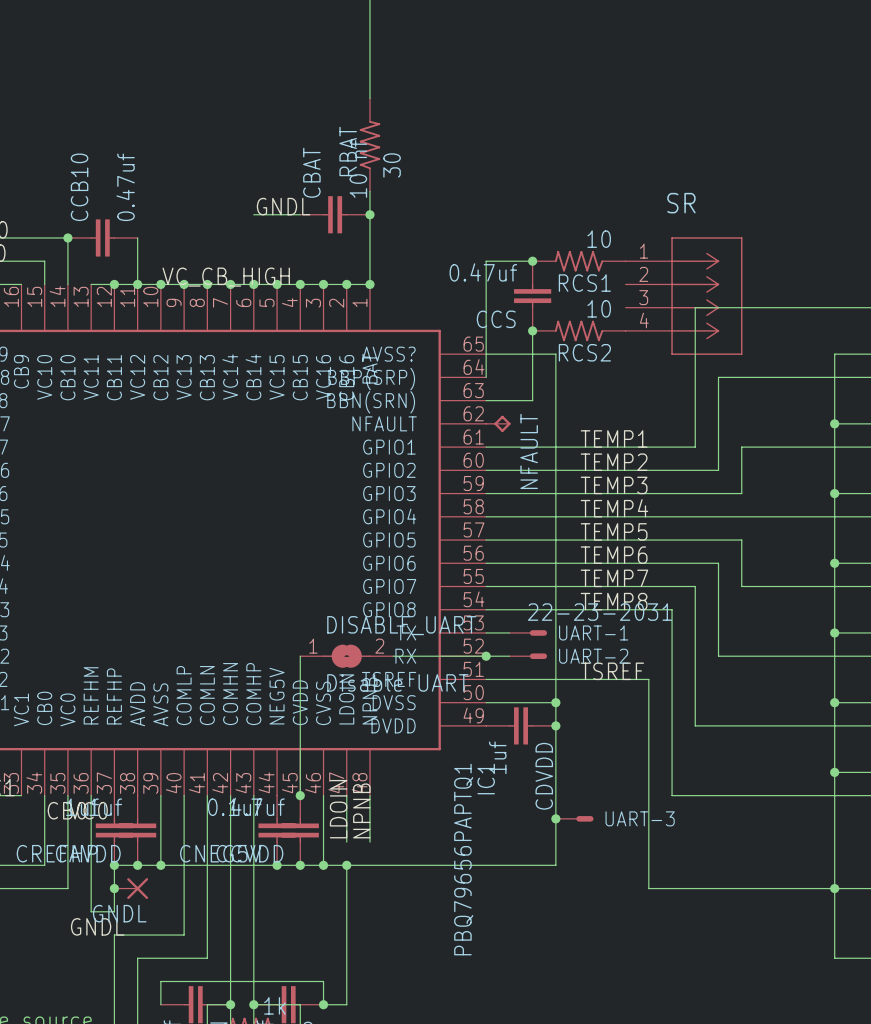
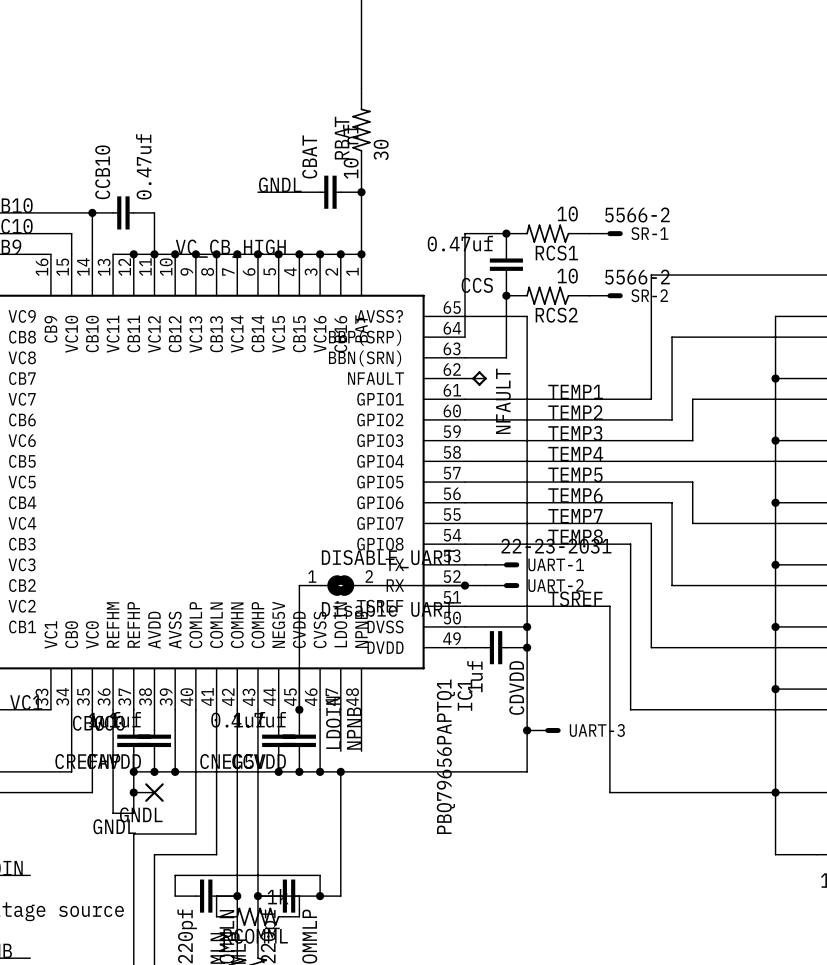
SR-1: none -> 5566-2 (605, 233)
SR: (684, 296) -> none
SR-2: none -> 5566-2 (605, 295)

